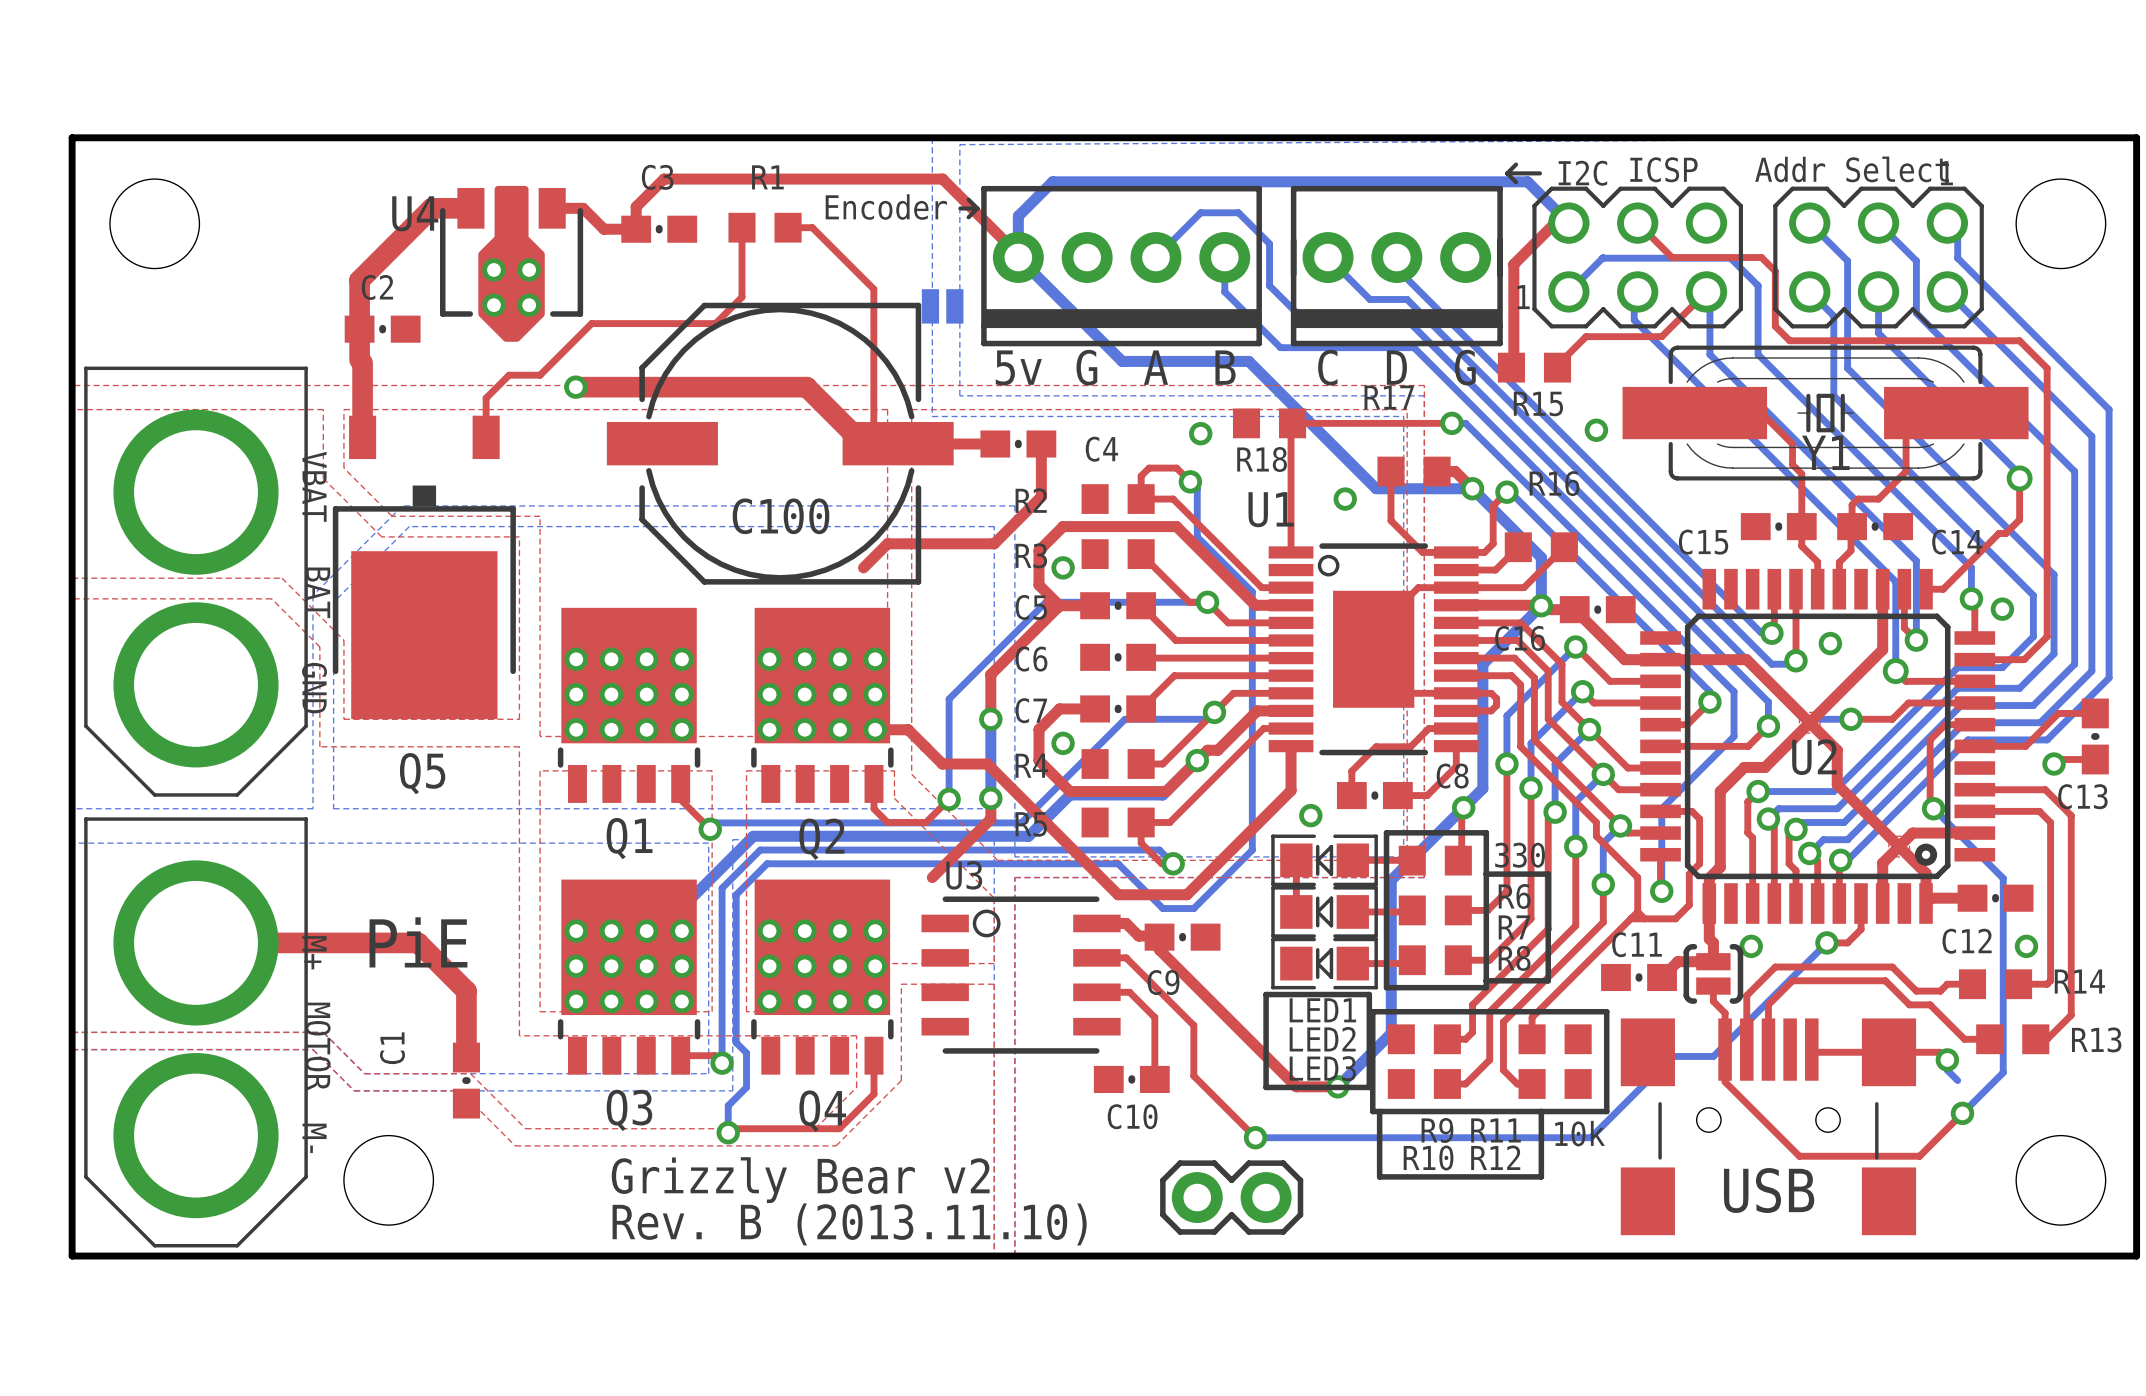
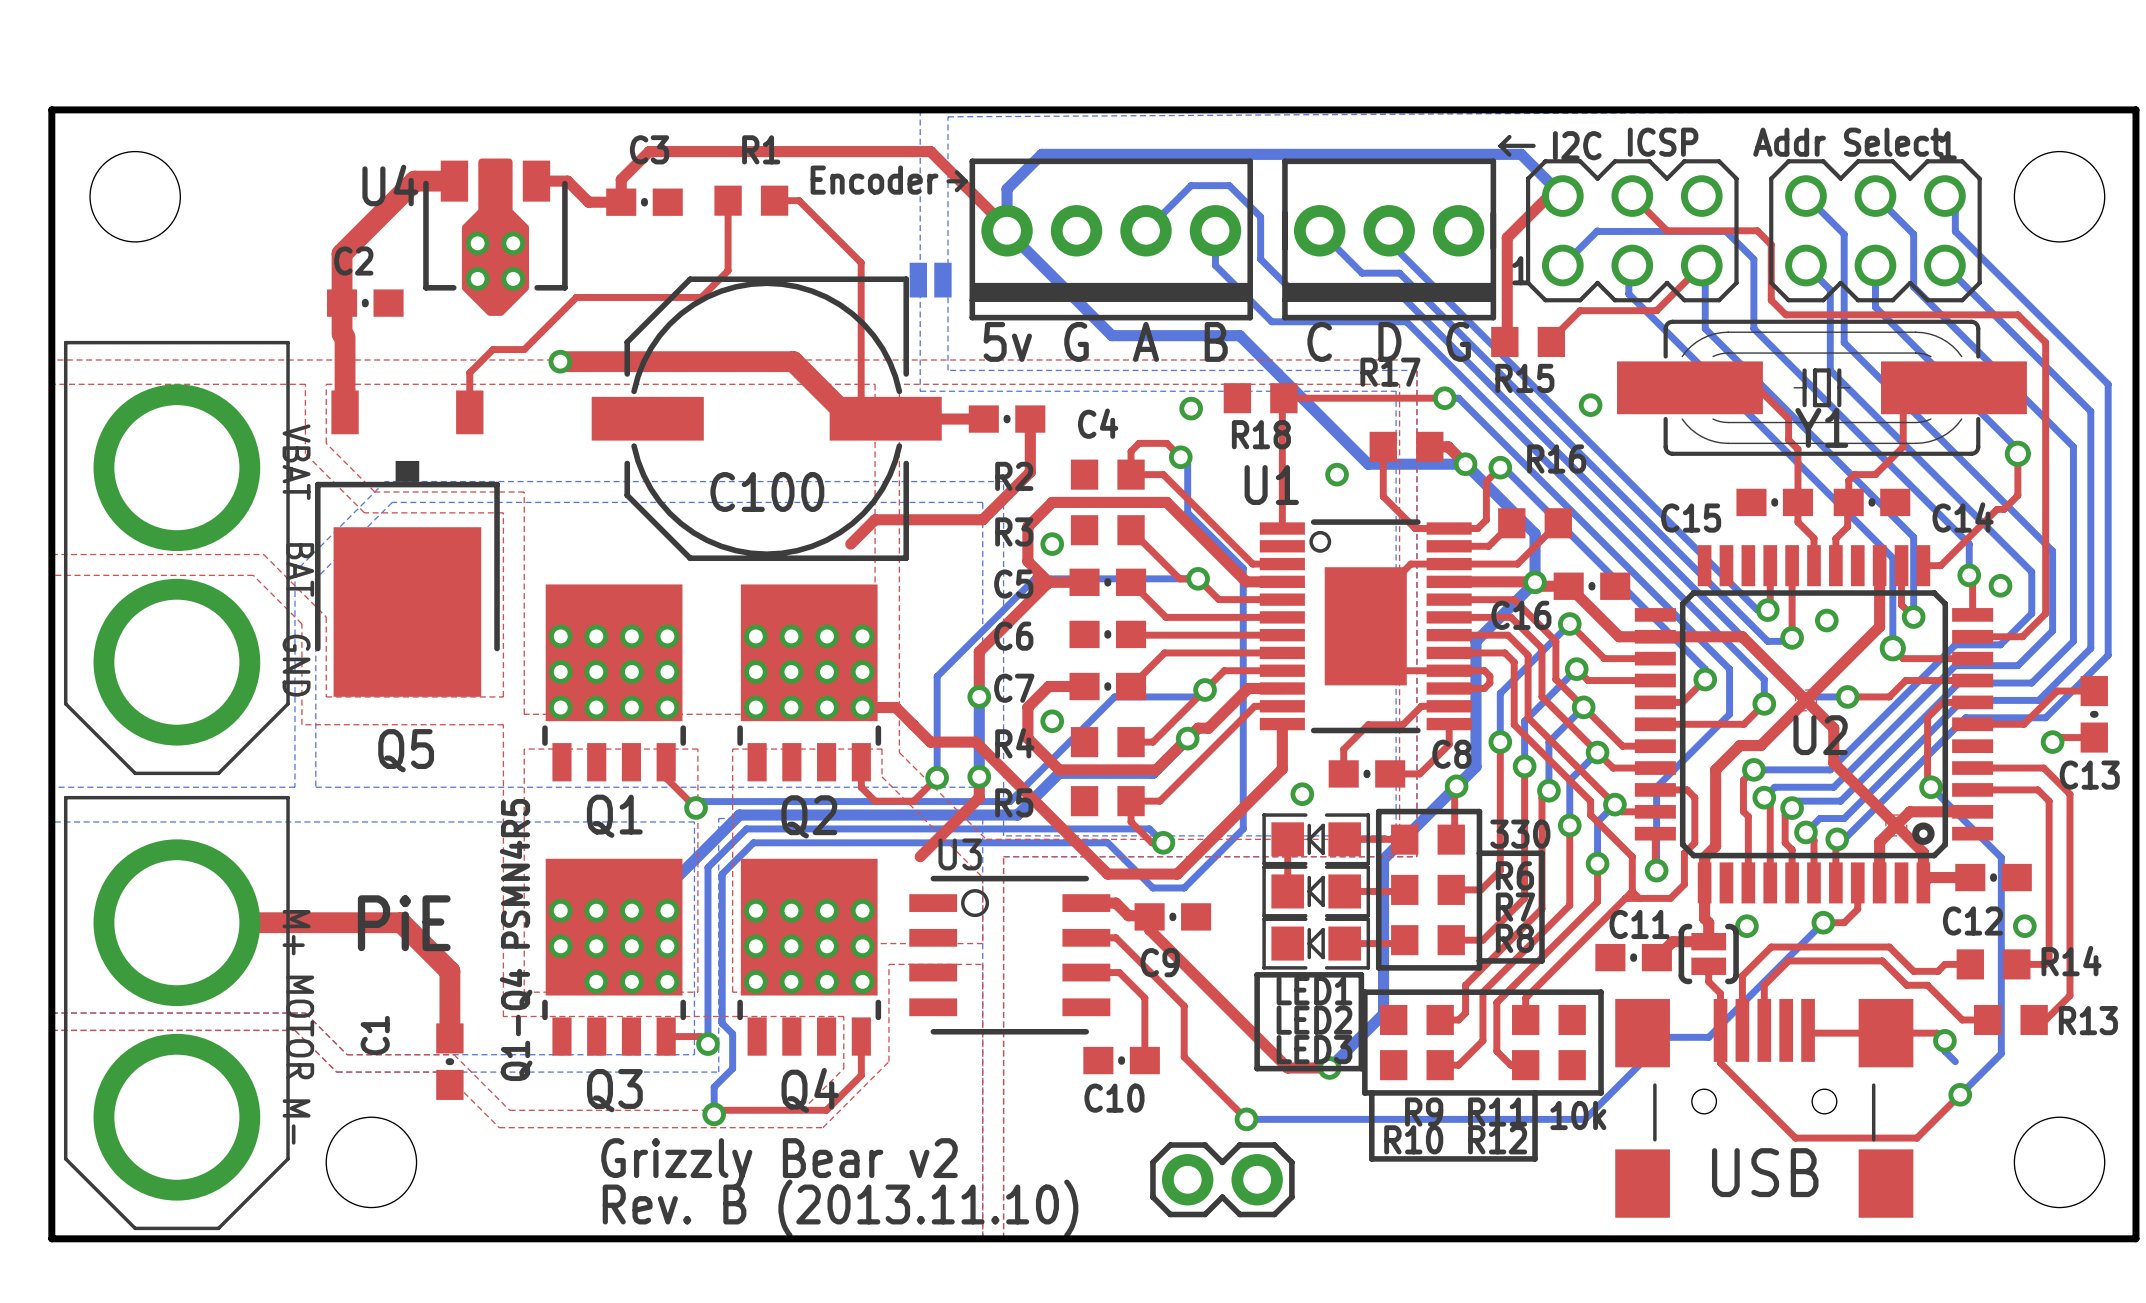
text: none -> Q1-Q4 PSMN4R5 (516, 940)
via: (576, 1001) -> none

